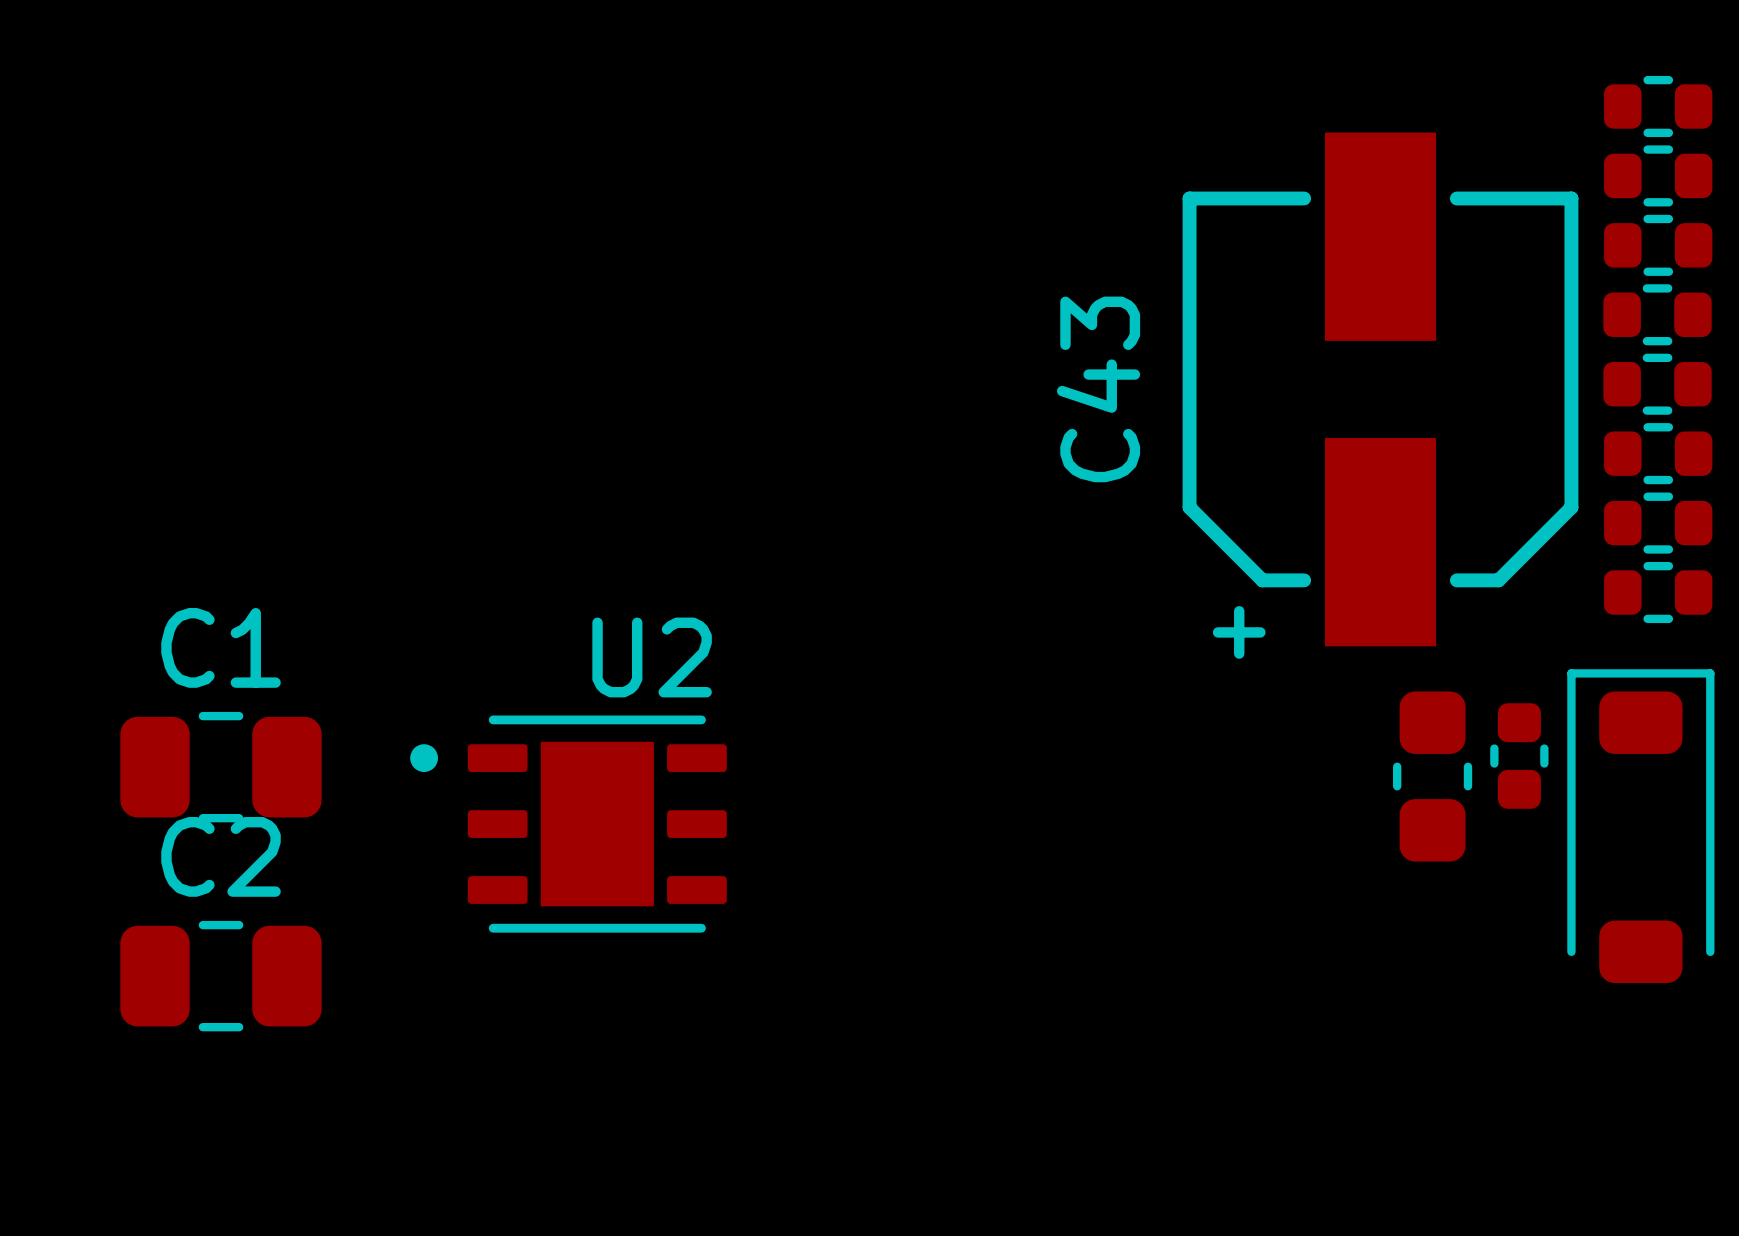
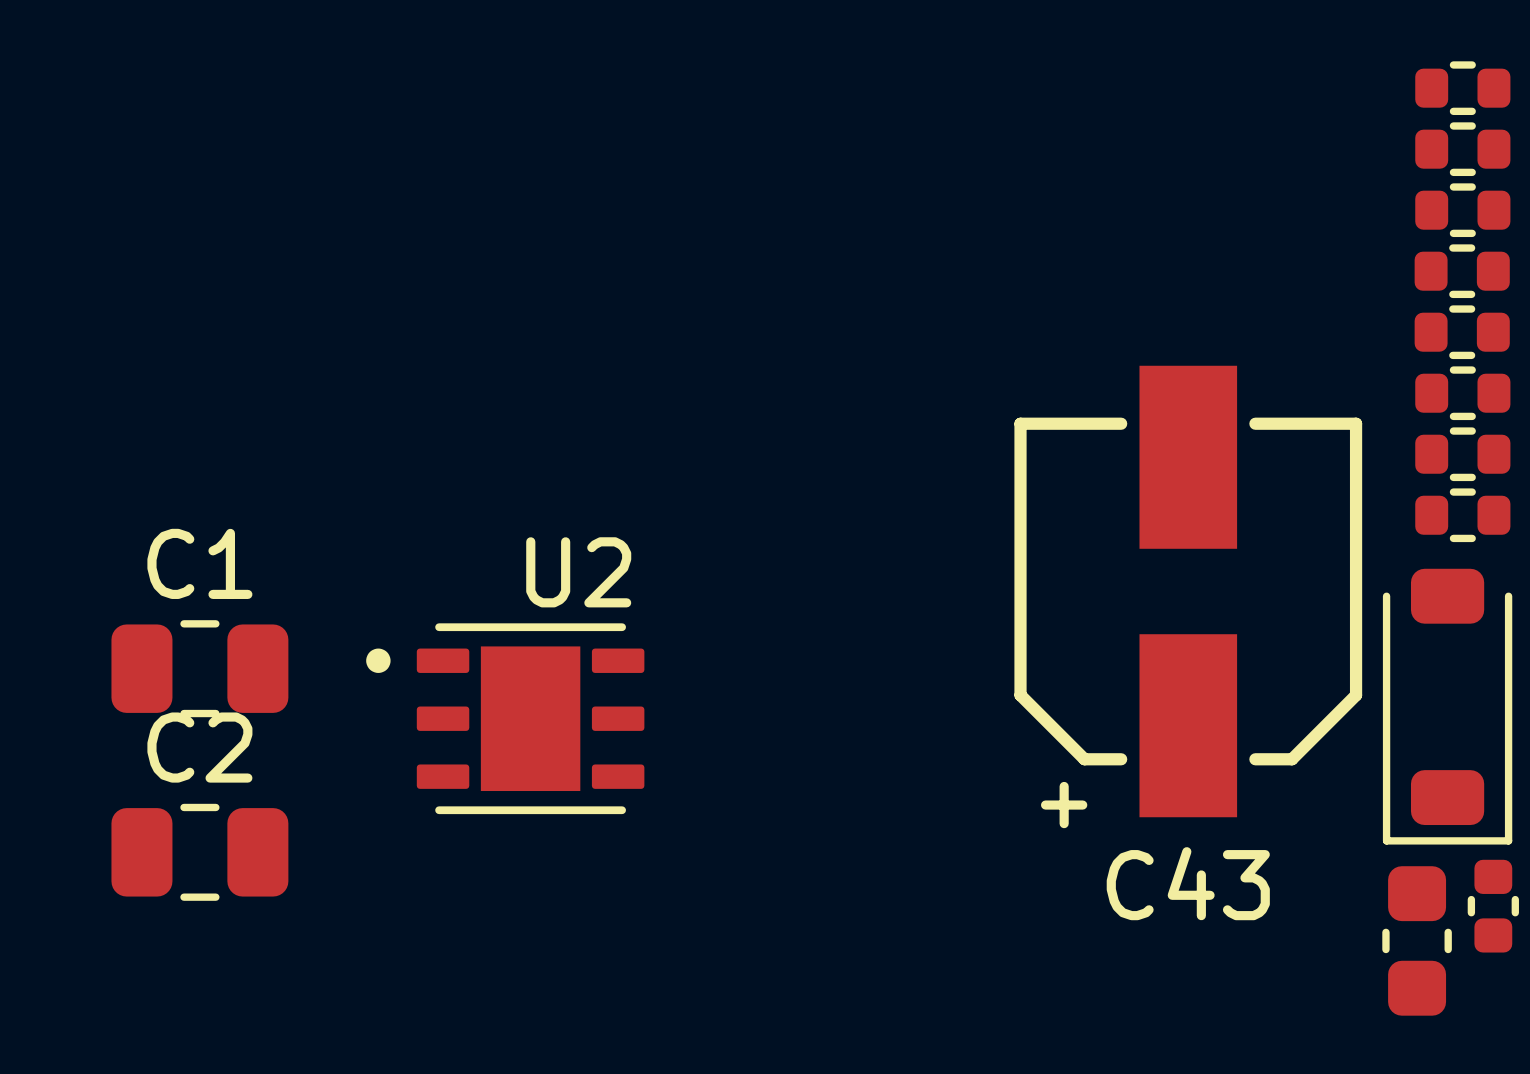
C43 name rotation: 0° (1098, 389) -> 90° clockwise (1188, 883)
C43 name position: C43 (1098, 389) -> C43 (1188, 883)
C43 position: (1380, 389) -> (1188, 591)
part position: (1519, 756) -> (1493, 906)
part position: (1432, 776) -> (1417, 940)
part rotation: 0° (1640, 826) -> 180° (1447, 706)

